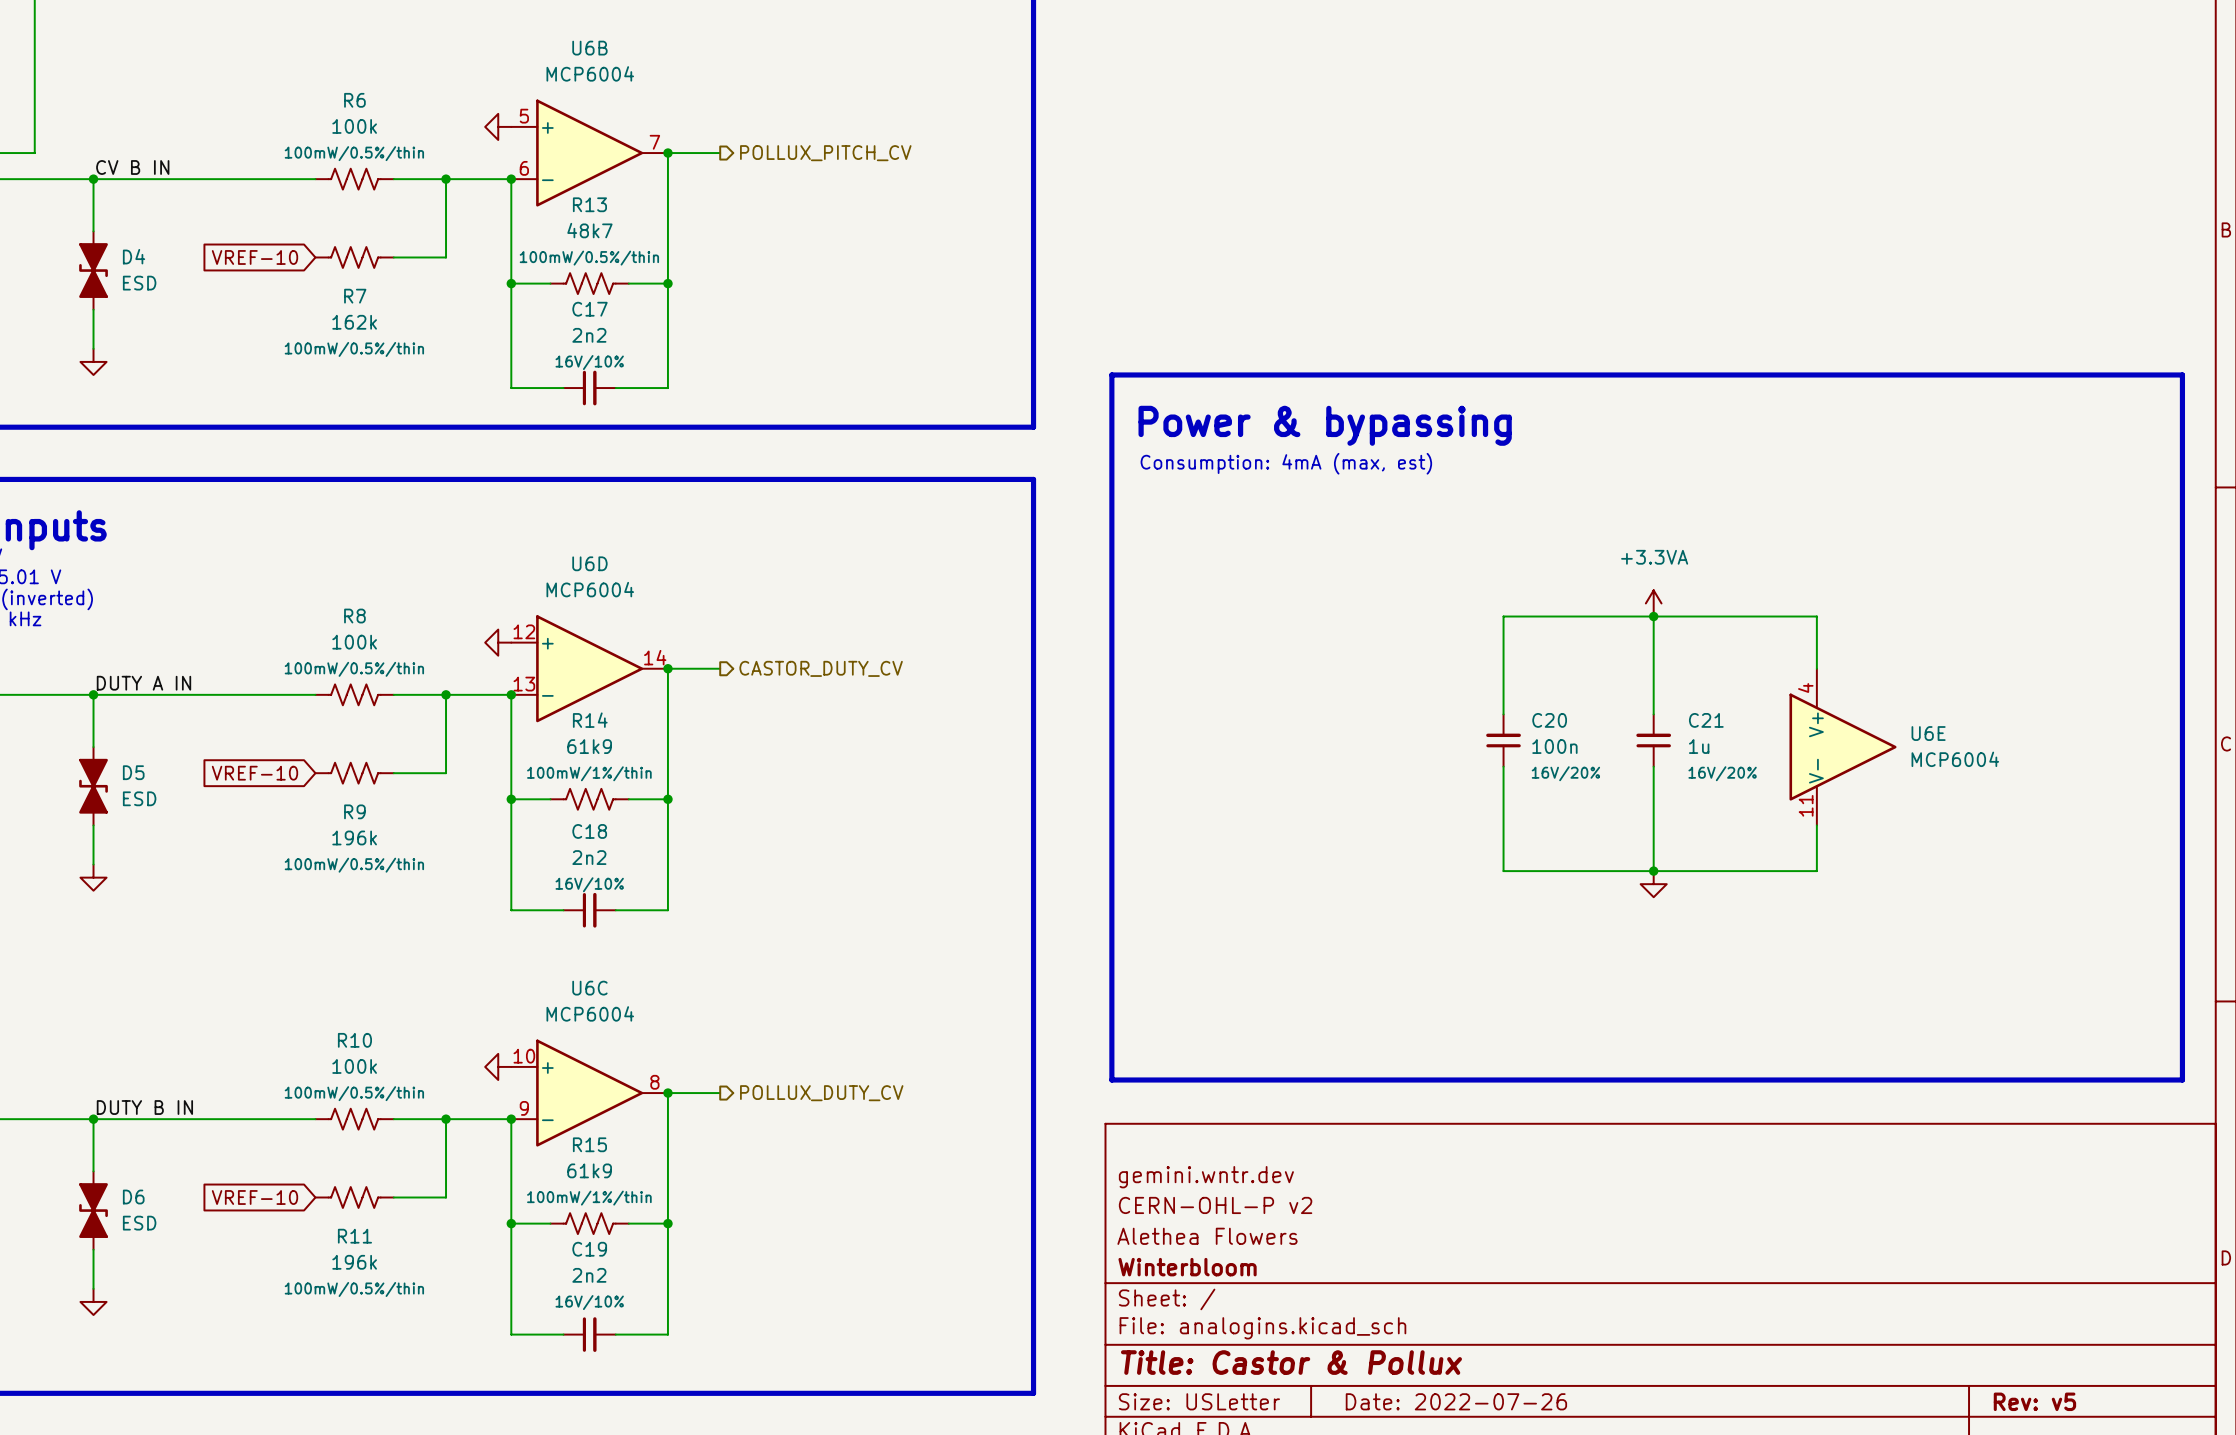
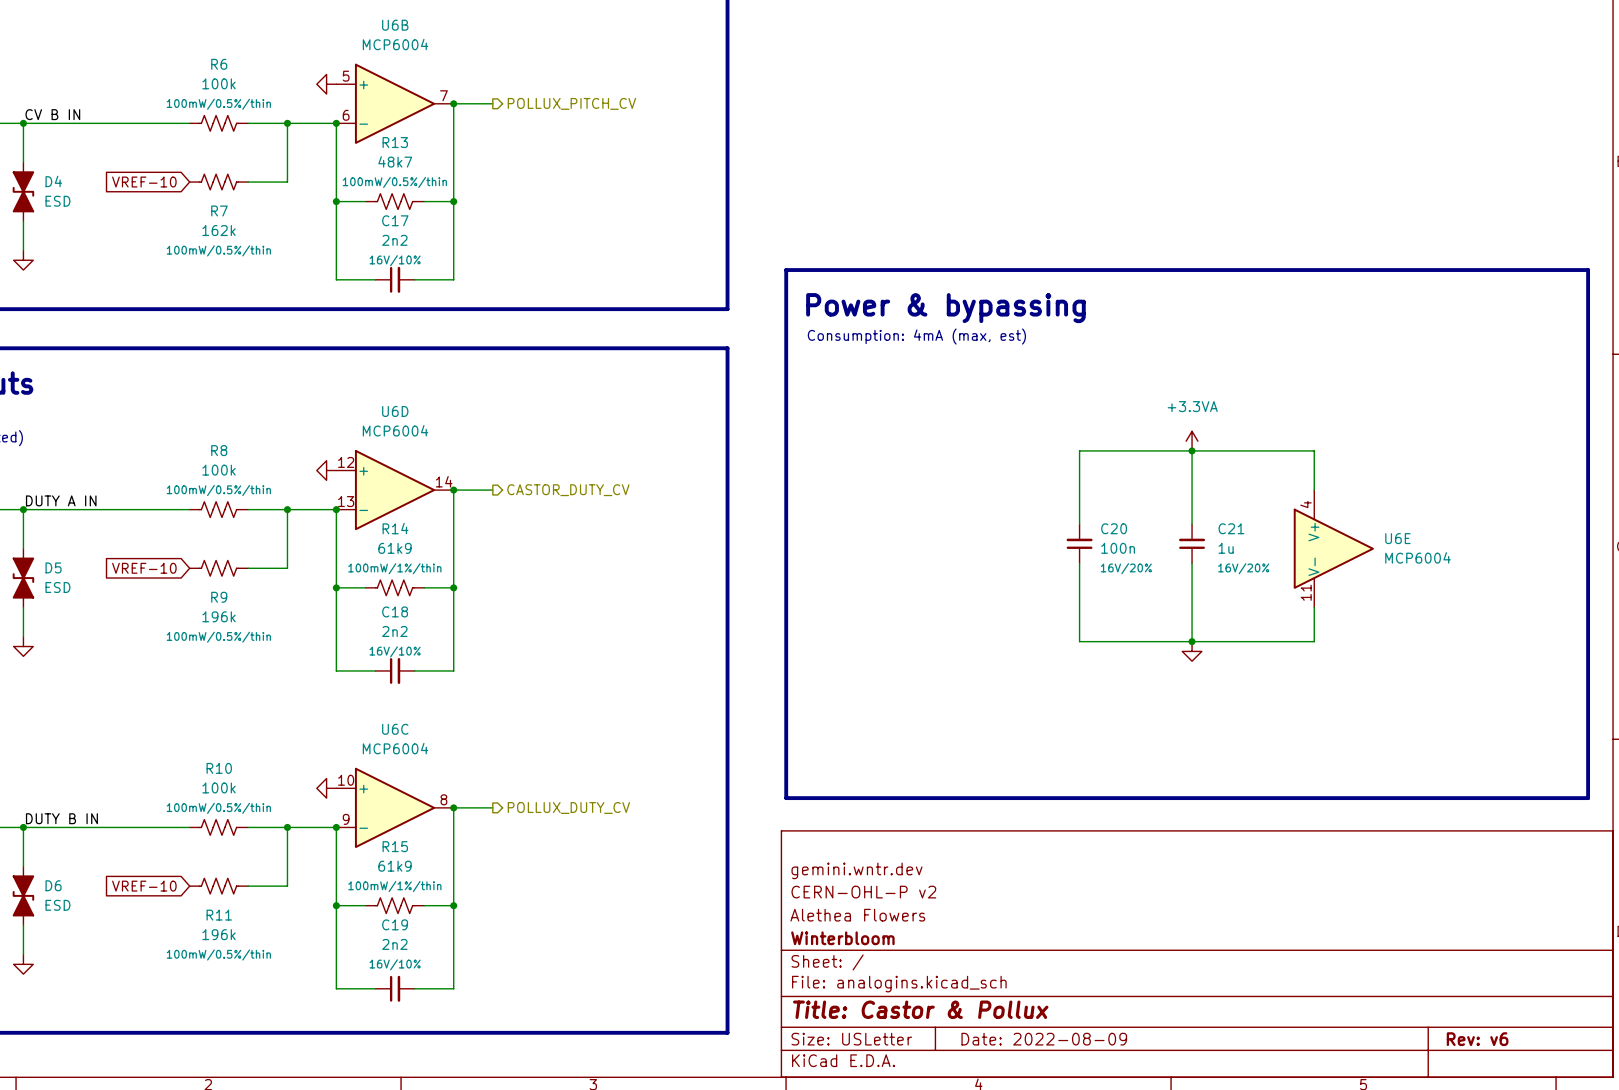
title block: Date: 2022-07-26 (1456, 1401) -> Date: 2022-08-09 (1044, 1039)
title block: Rev: v5 (2034, 1401) -> Rev: v6 (1477, 1039)

